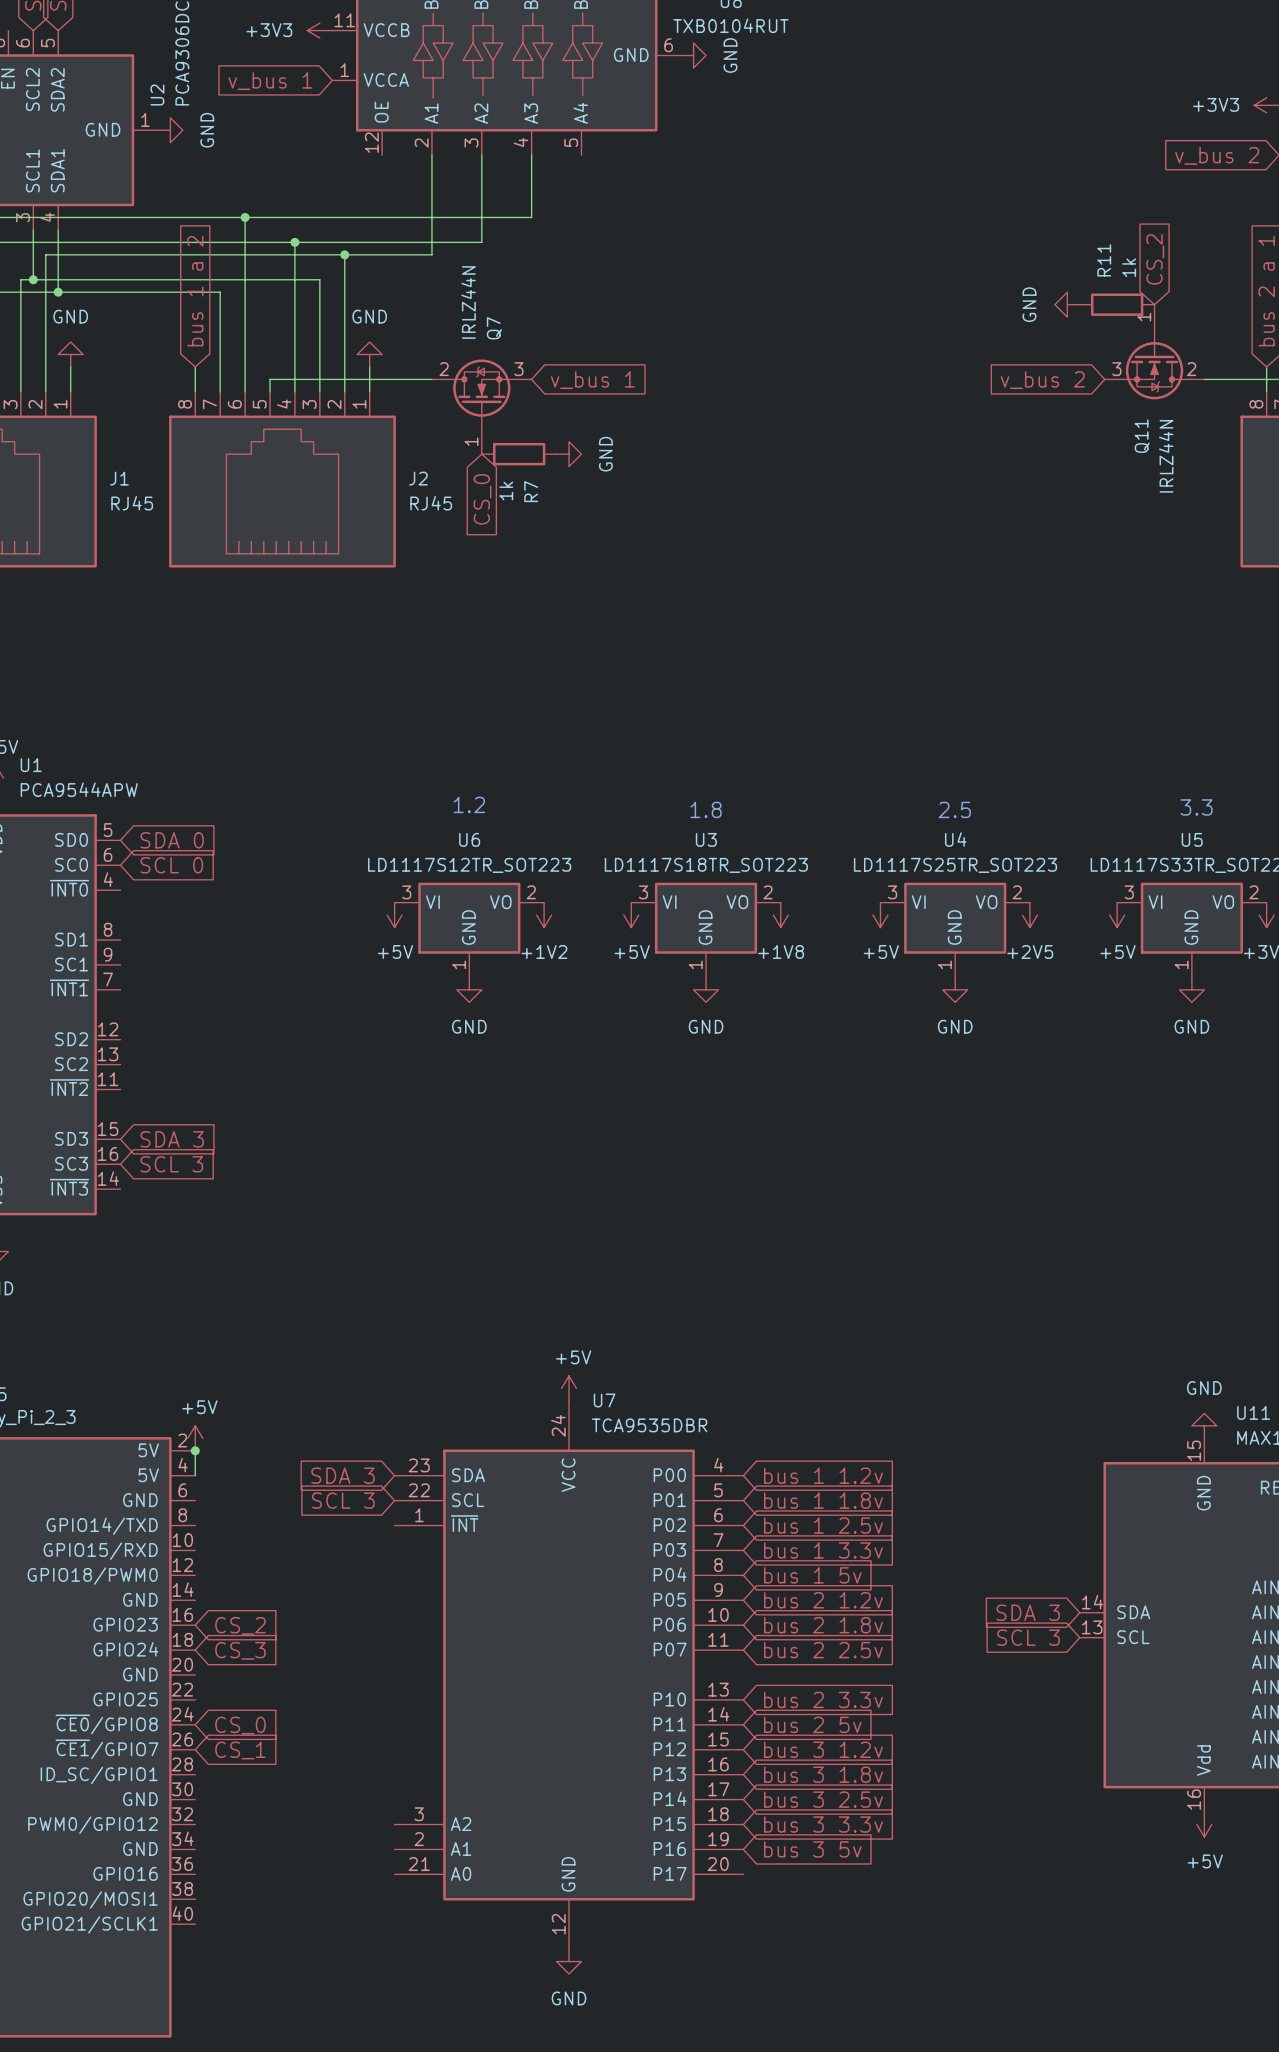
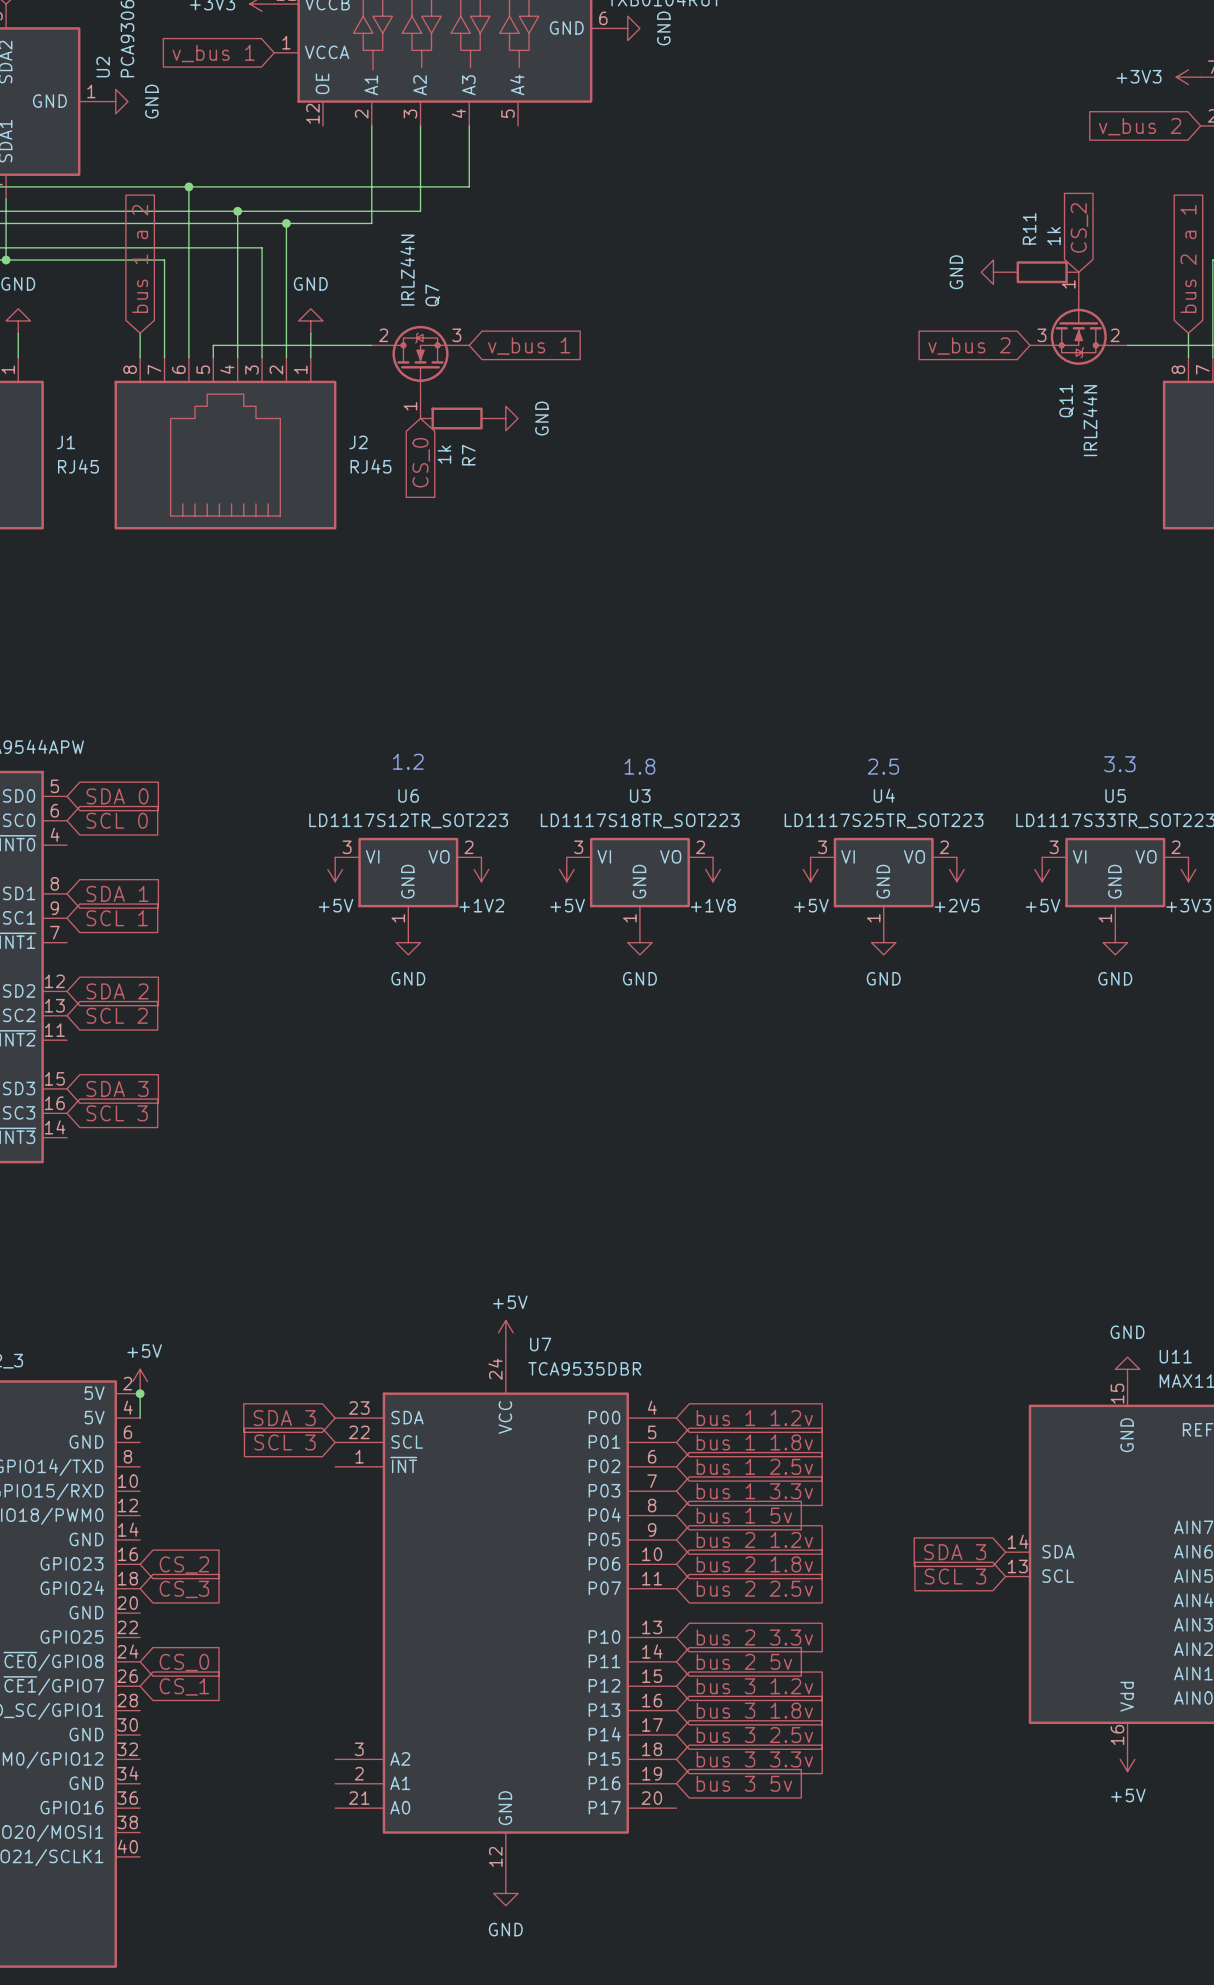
global label: none -> SDA 1 (117, 893)
global label: none -> SCL 1 (117, 918)
global label: none -> SDA 2 (117, 991)
global label: none -> SCL 2 (117, 1015)

